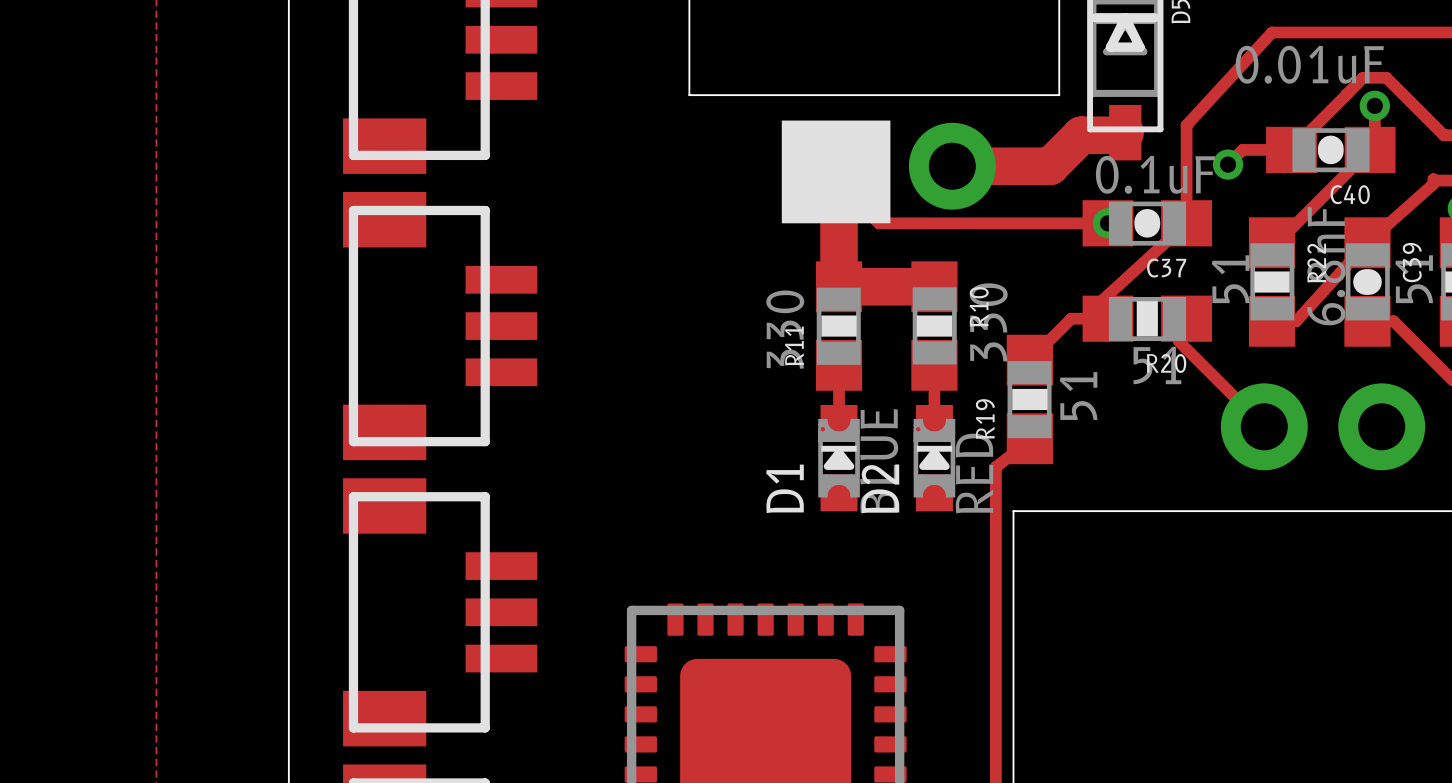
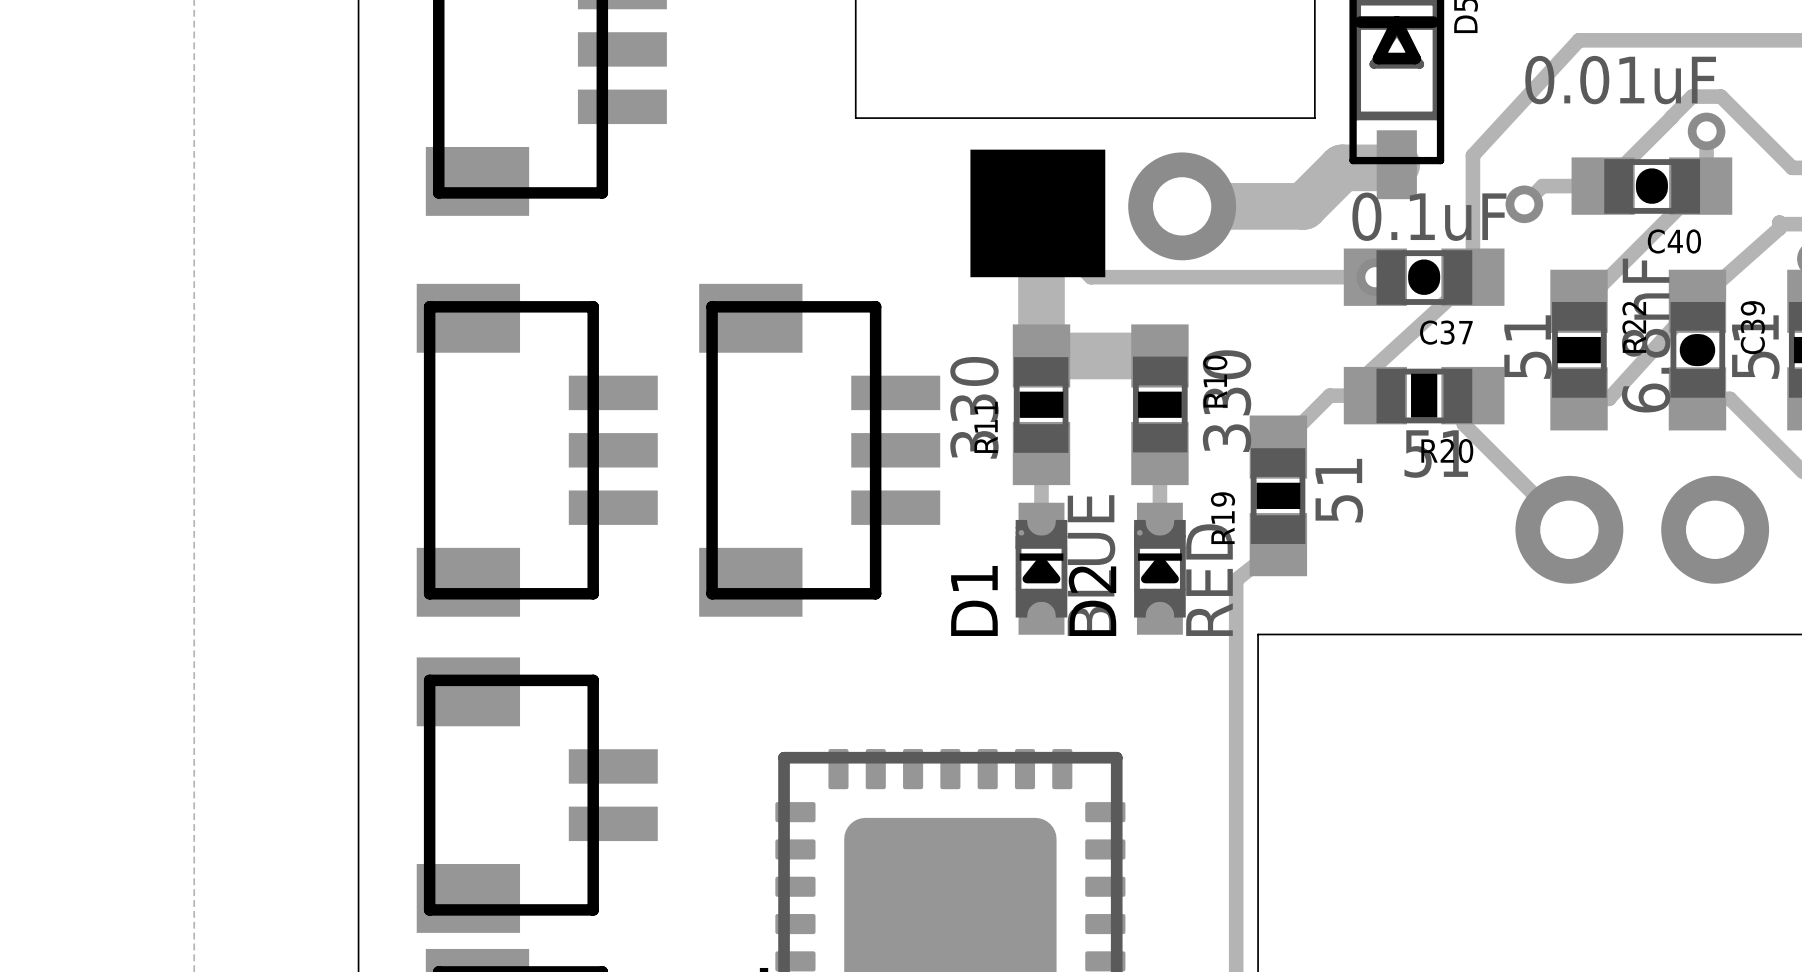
part position: (440, 326) -> (537, 450)
part: none -> (819, 450)
part footprint: [343, 478, 538, 747] -> [416, 657, 658, 933]

